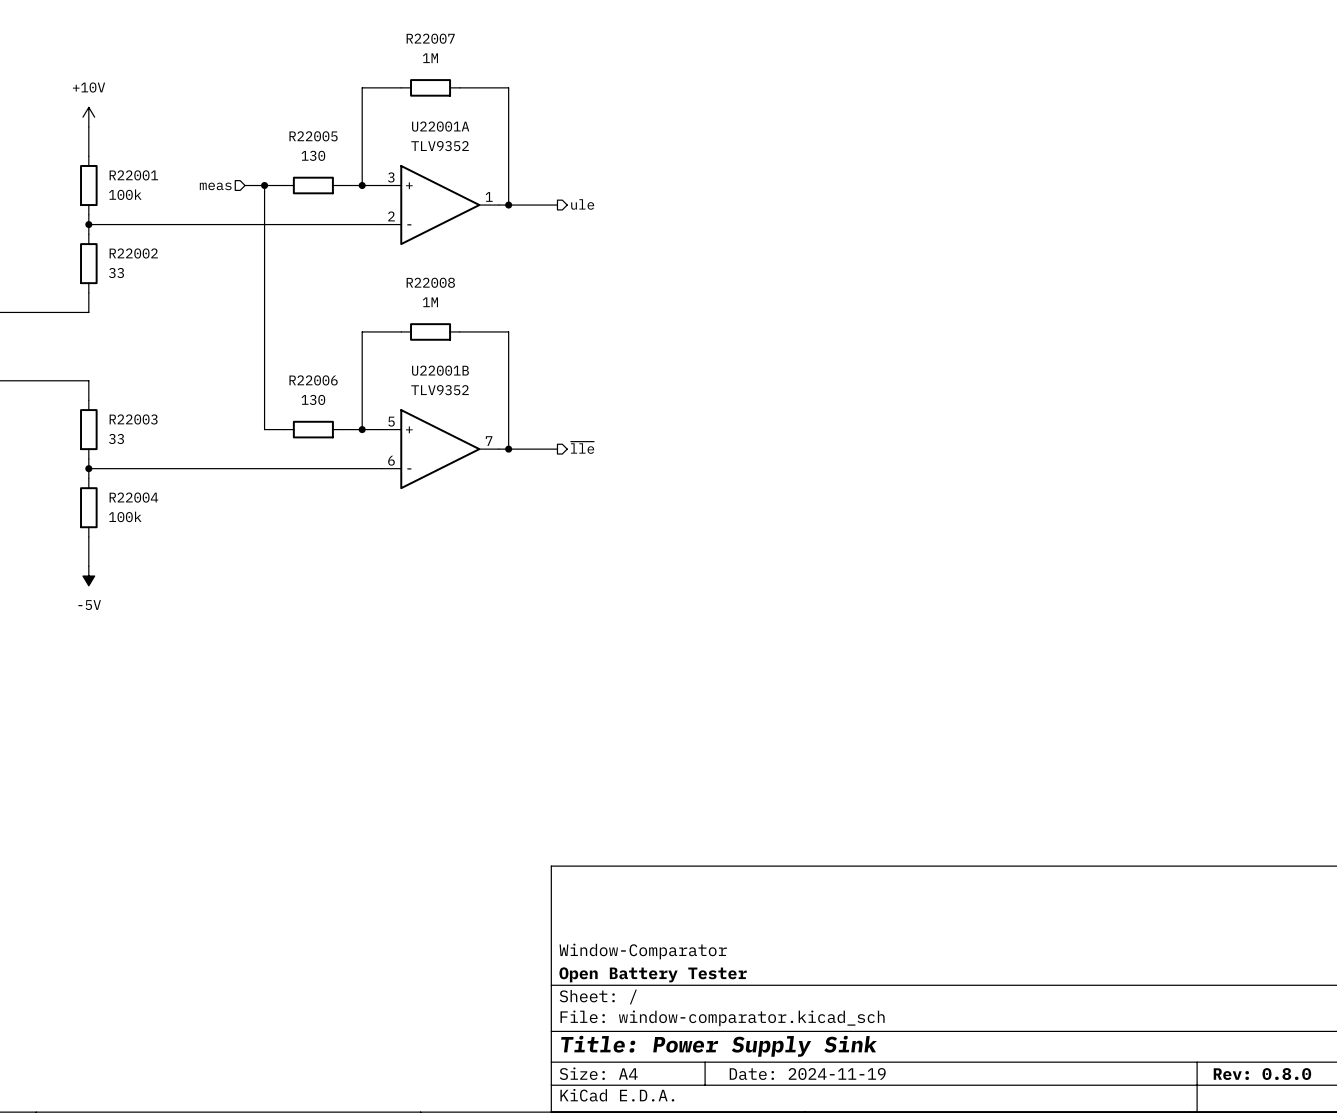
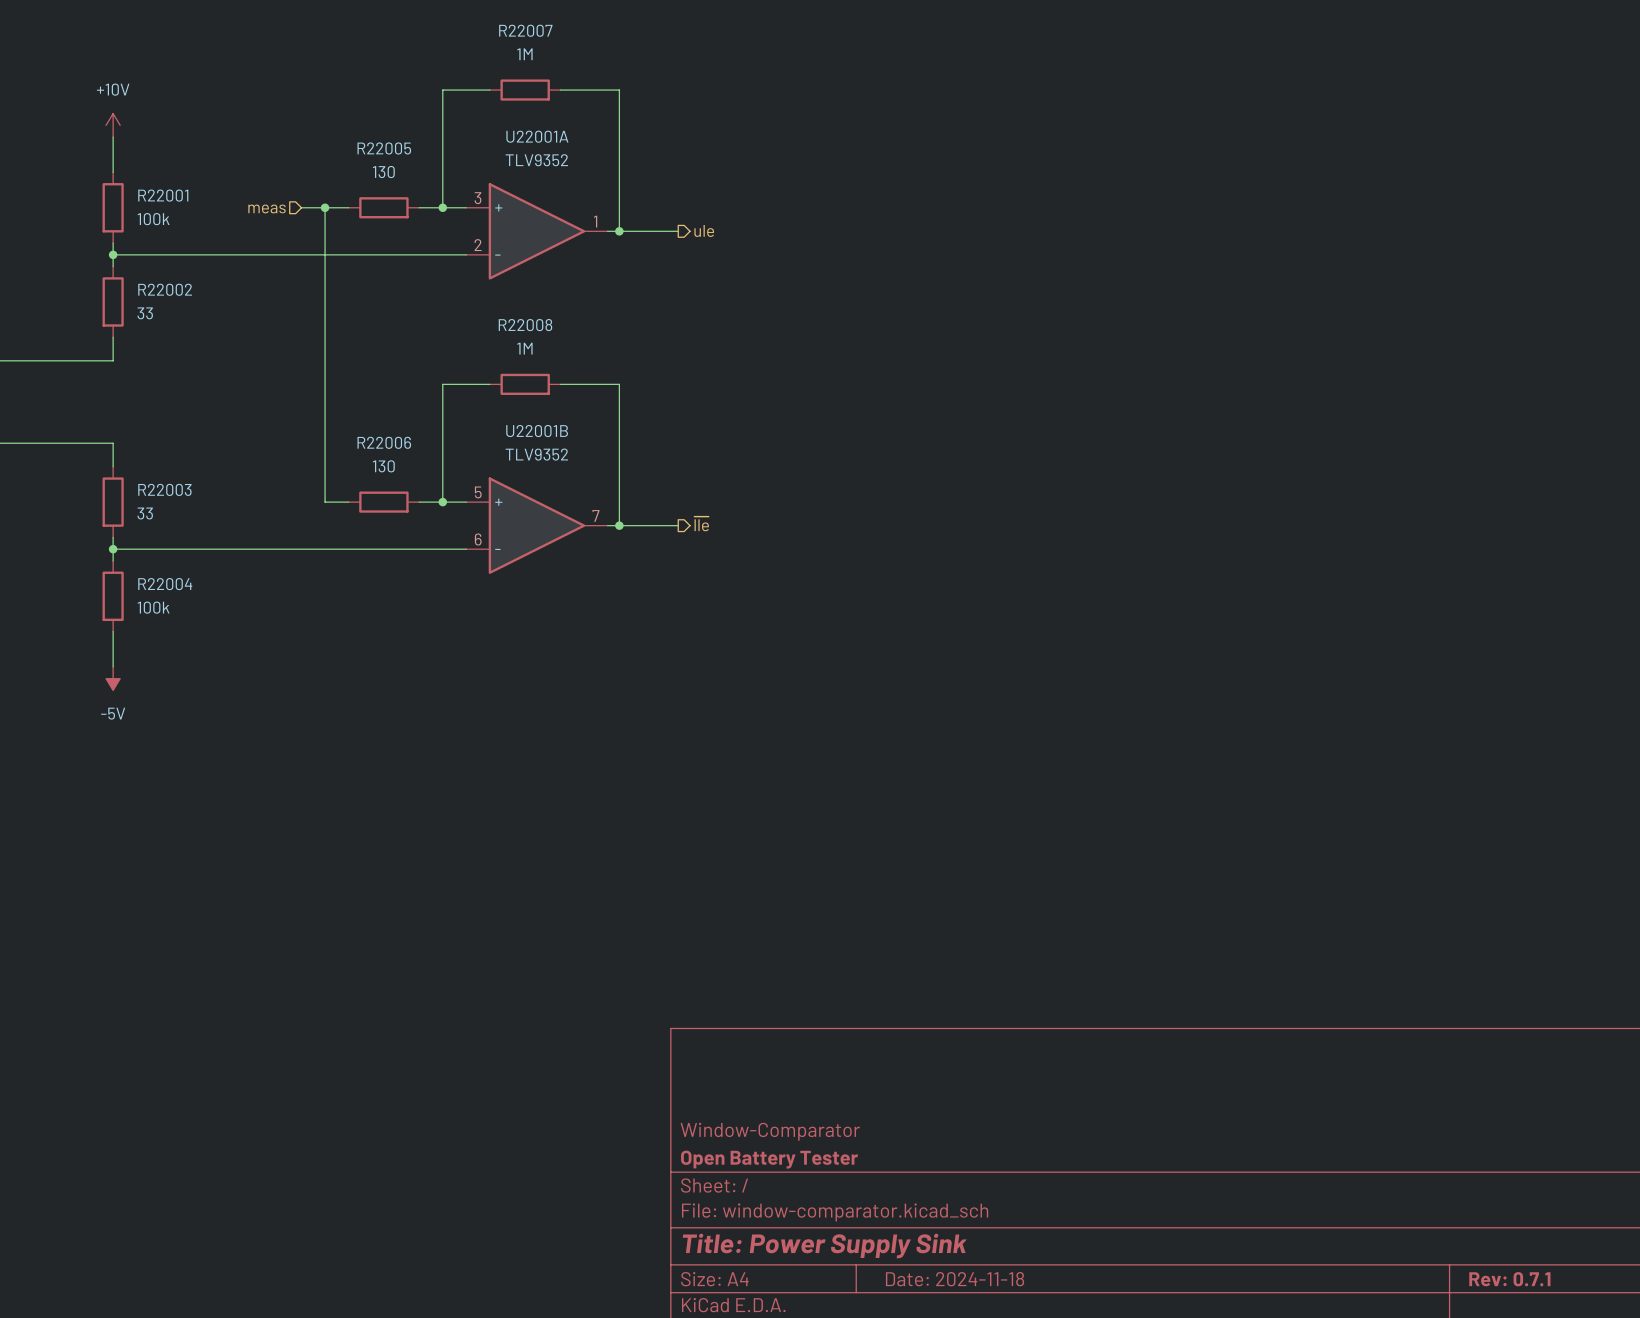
title block: Date: 2024-11-19 (807, 1074) -> Date: 2024-11-18 (955, 1279)
title block: Rev: 0.8.0 (1262, 1074) -> Rev: 0.7.1 (1509, 1279)

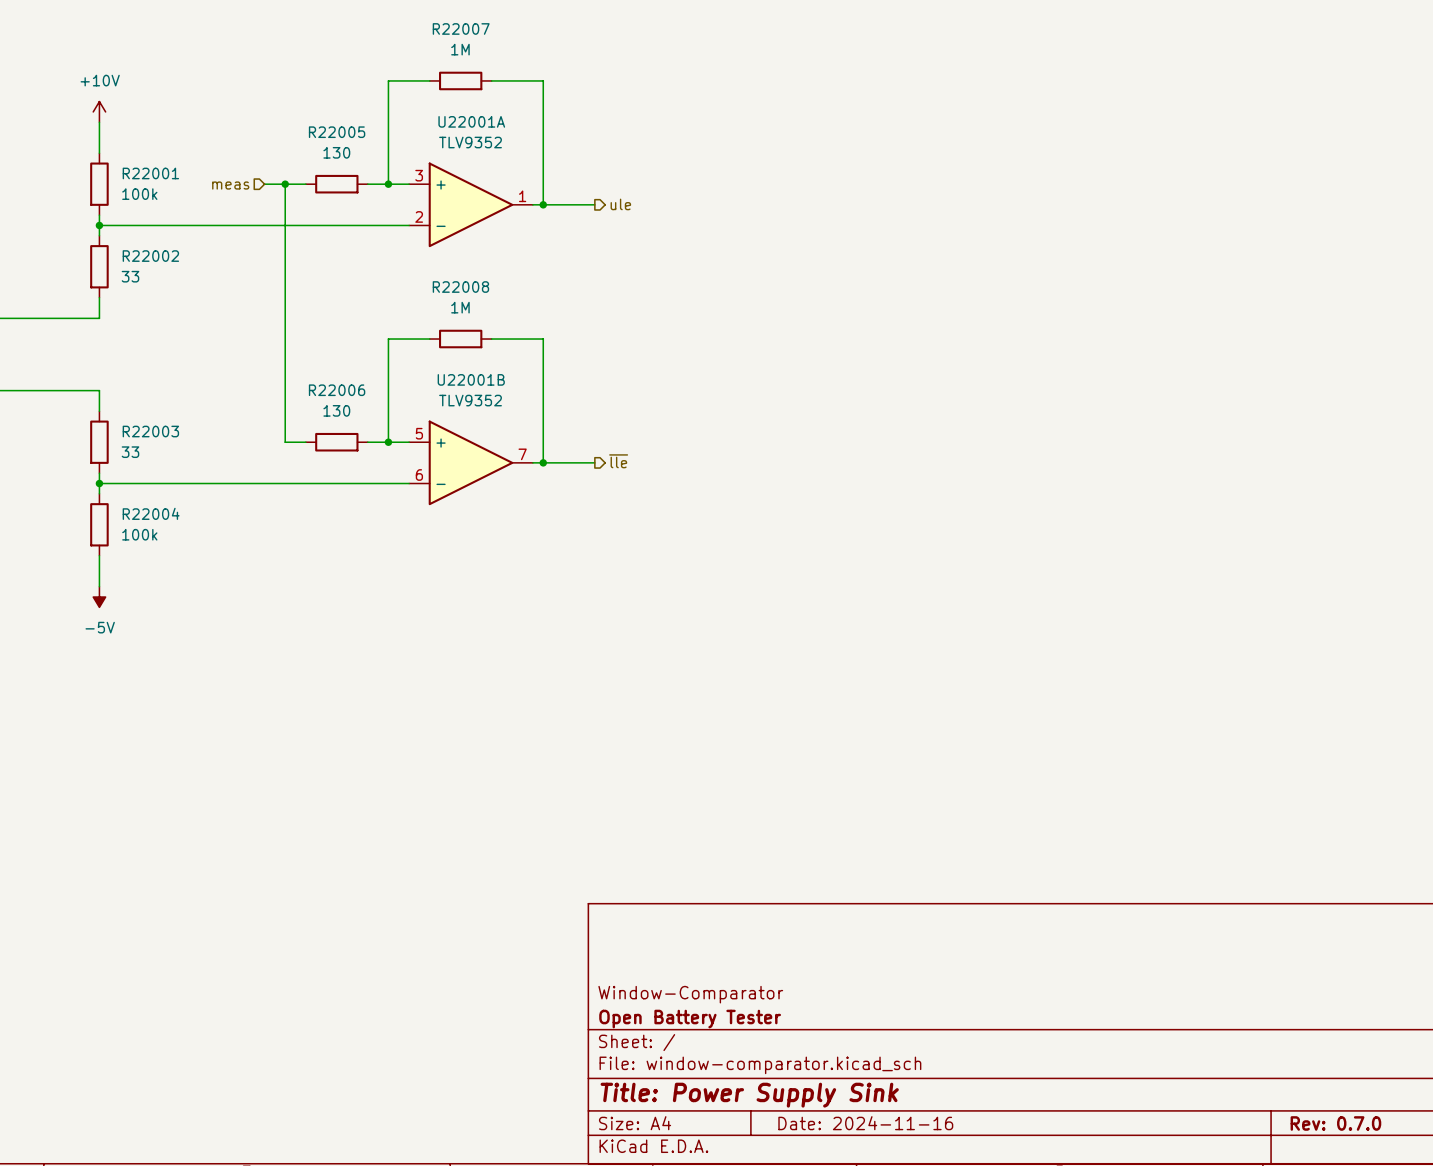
title block: Date: 2024-11-18 (955, 1279) -> Date: 2024-11-16 (865, 1123)
title block: Rev: 0.7.1 (1509, 1279) -> Rev: 0.7.0 (1335, 1123)

